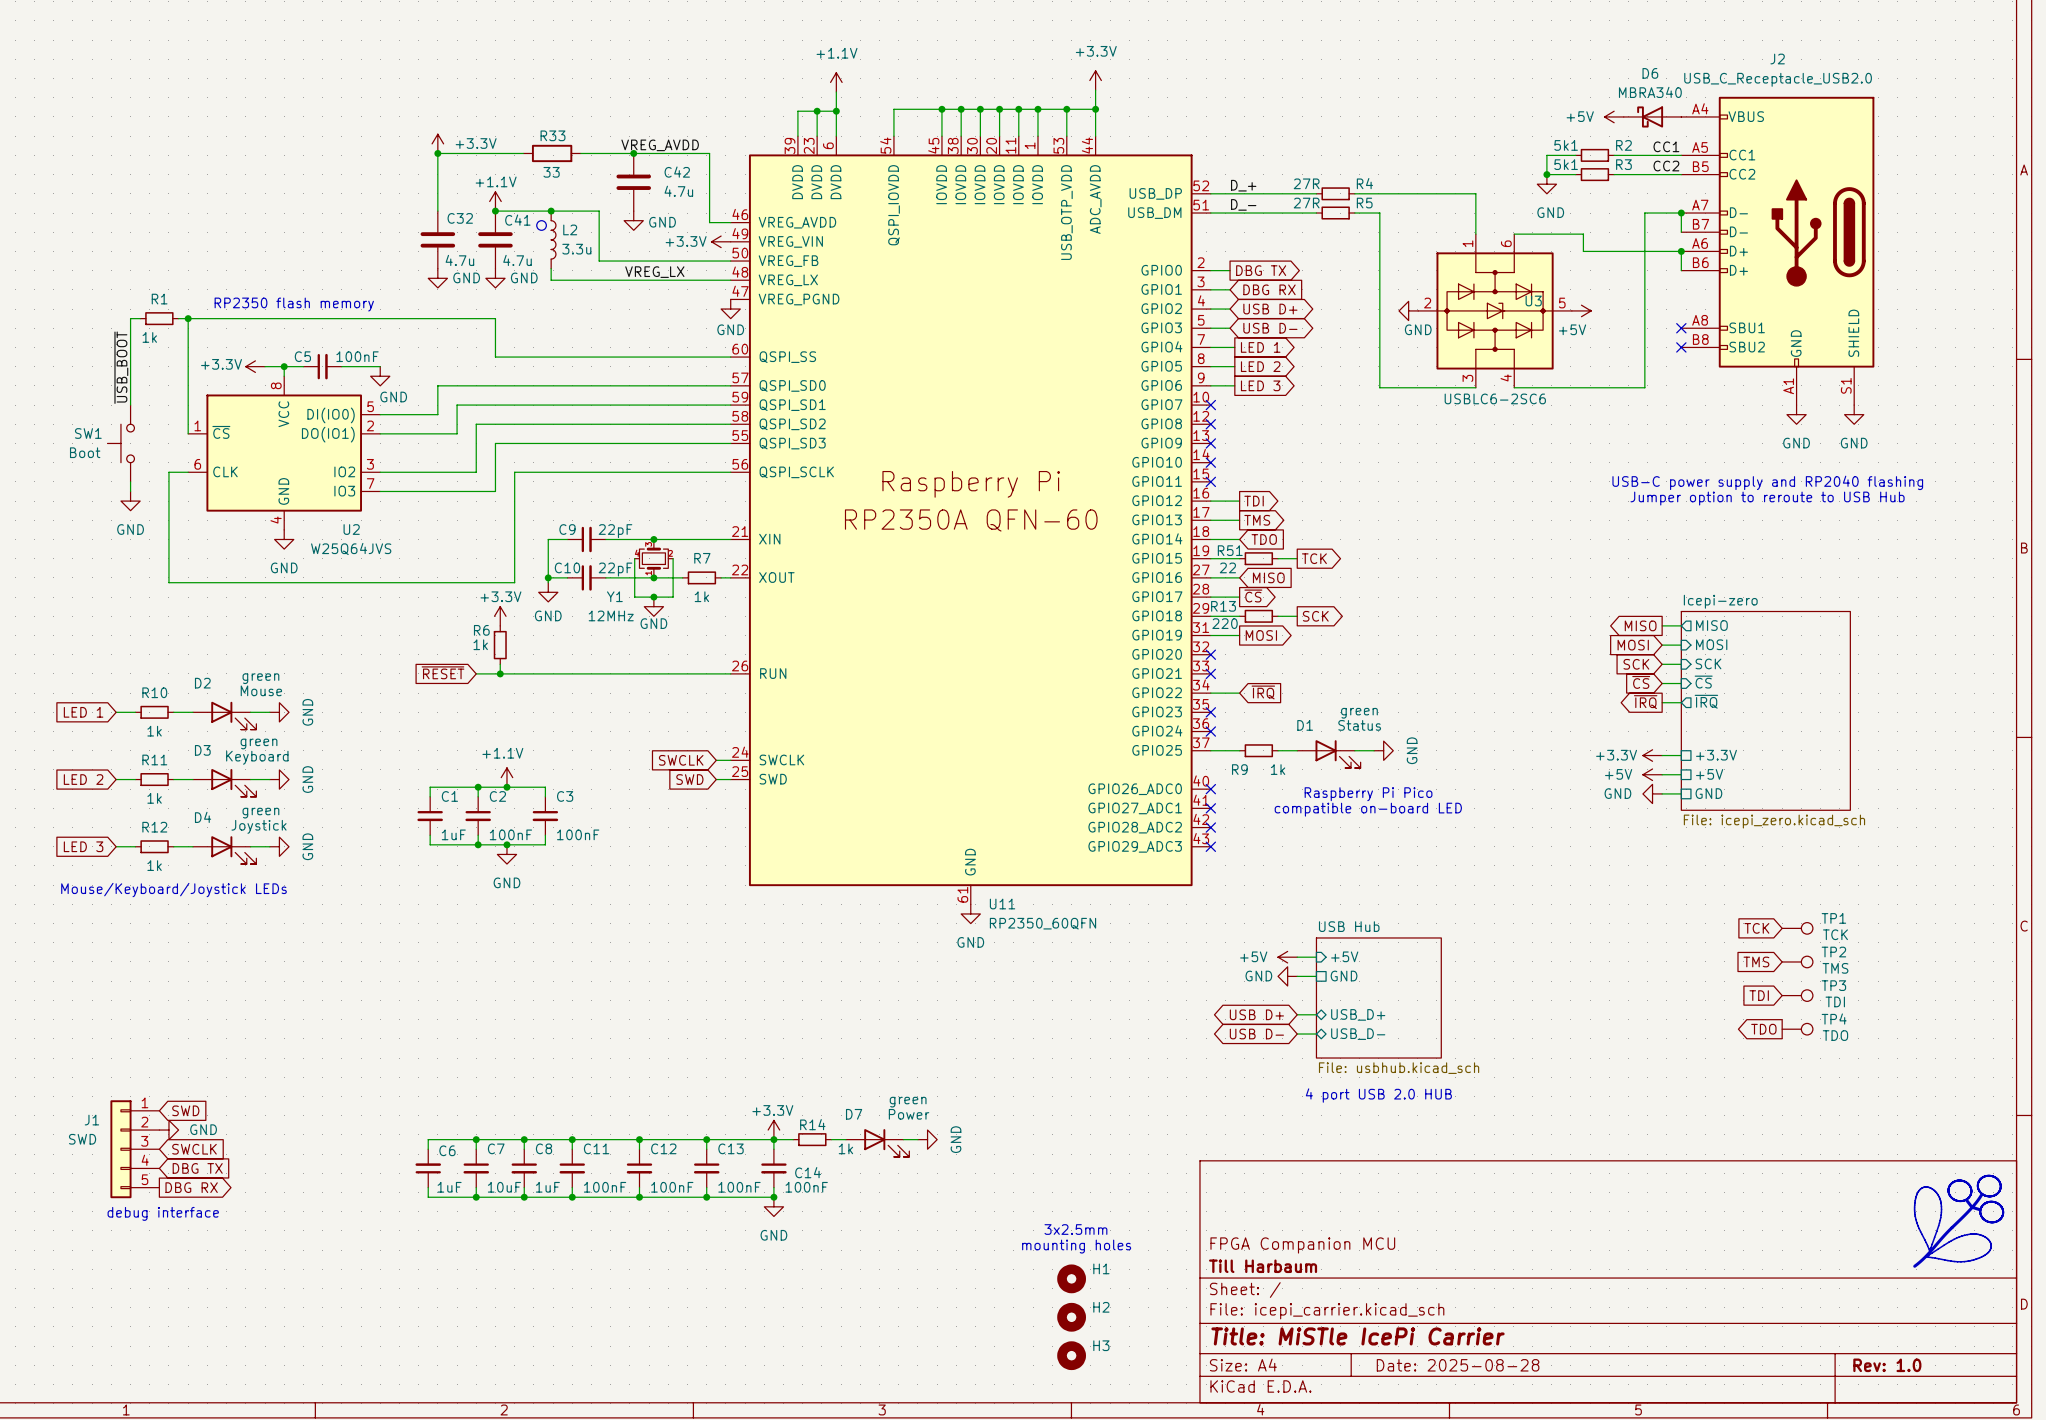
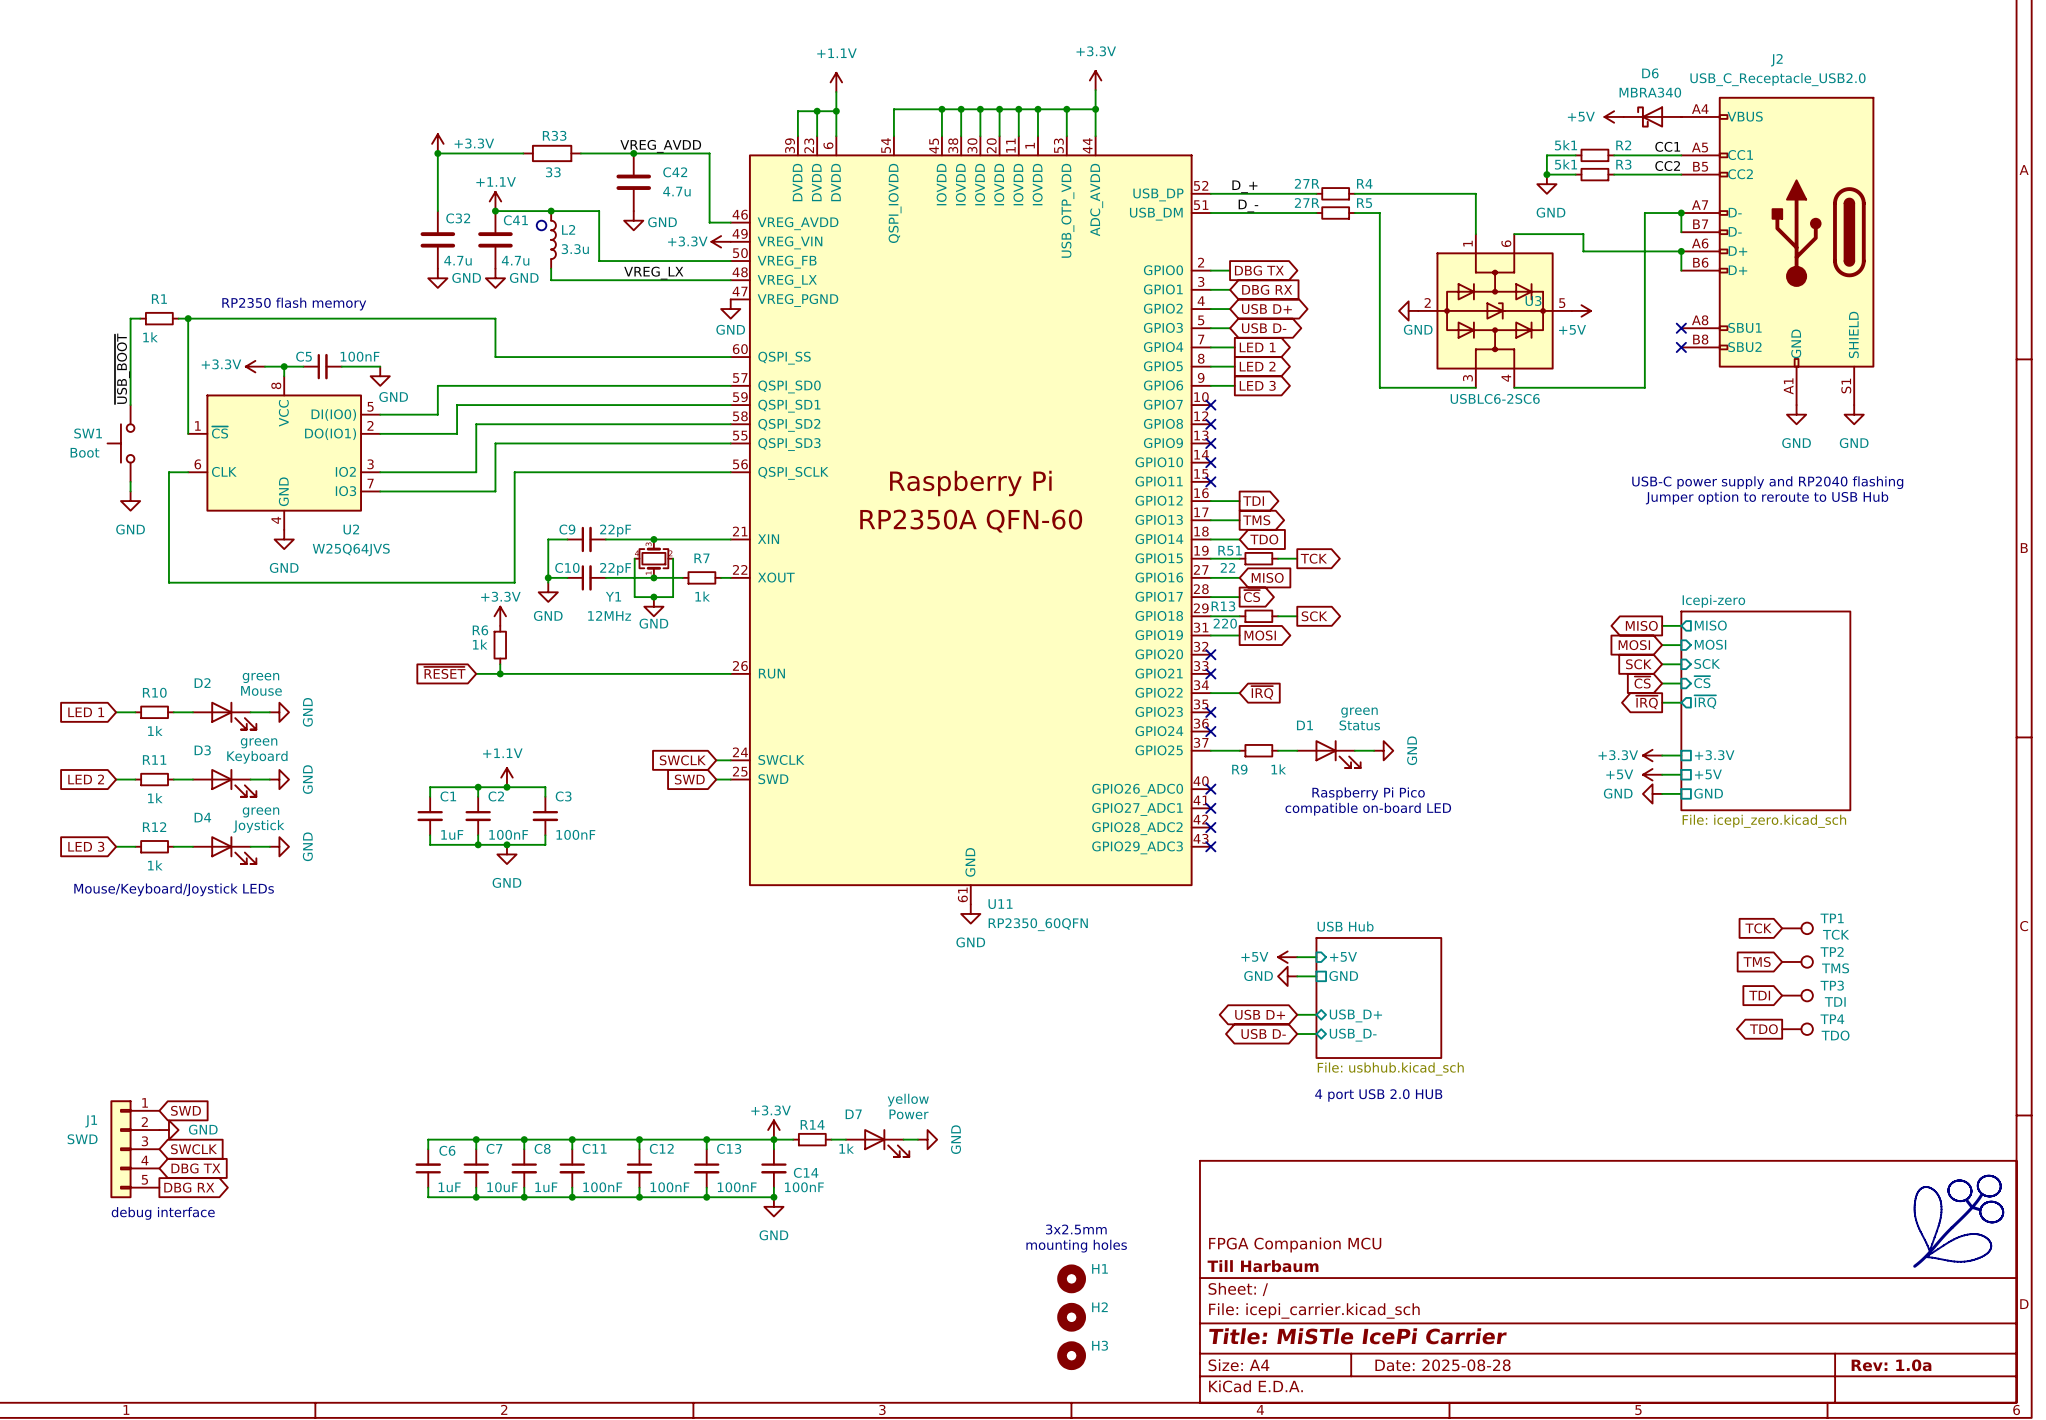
D7 value: green (908, 1102) -> yellow (908, 1100)
title block: Rev: 1.0 (1887, 1365) -> Rev: 1.0a (1891, 1365)

